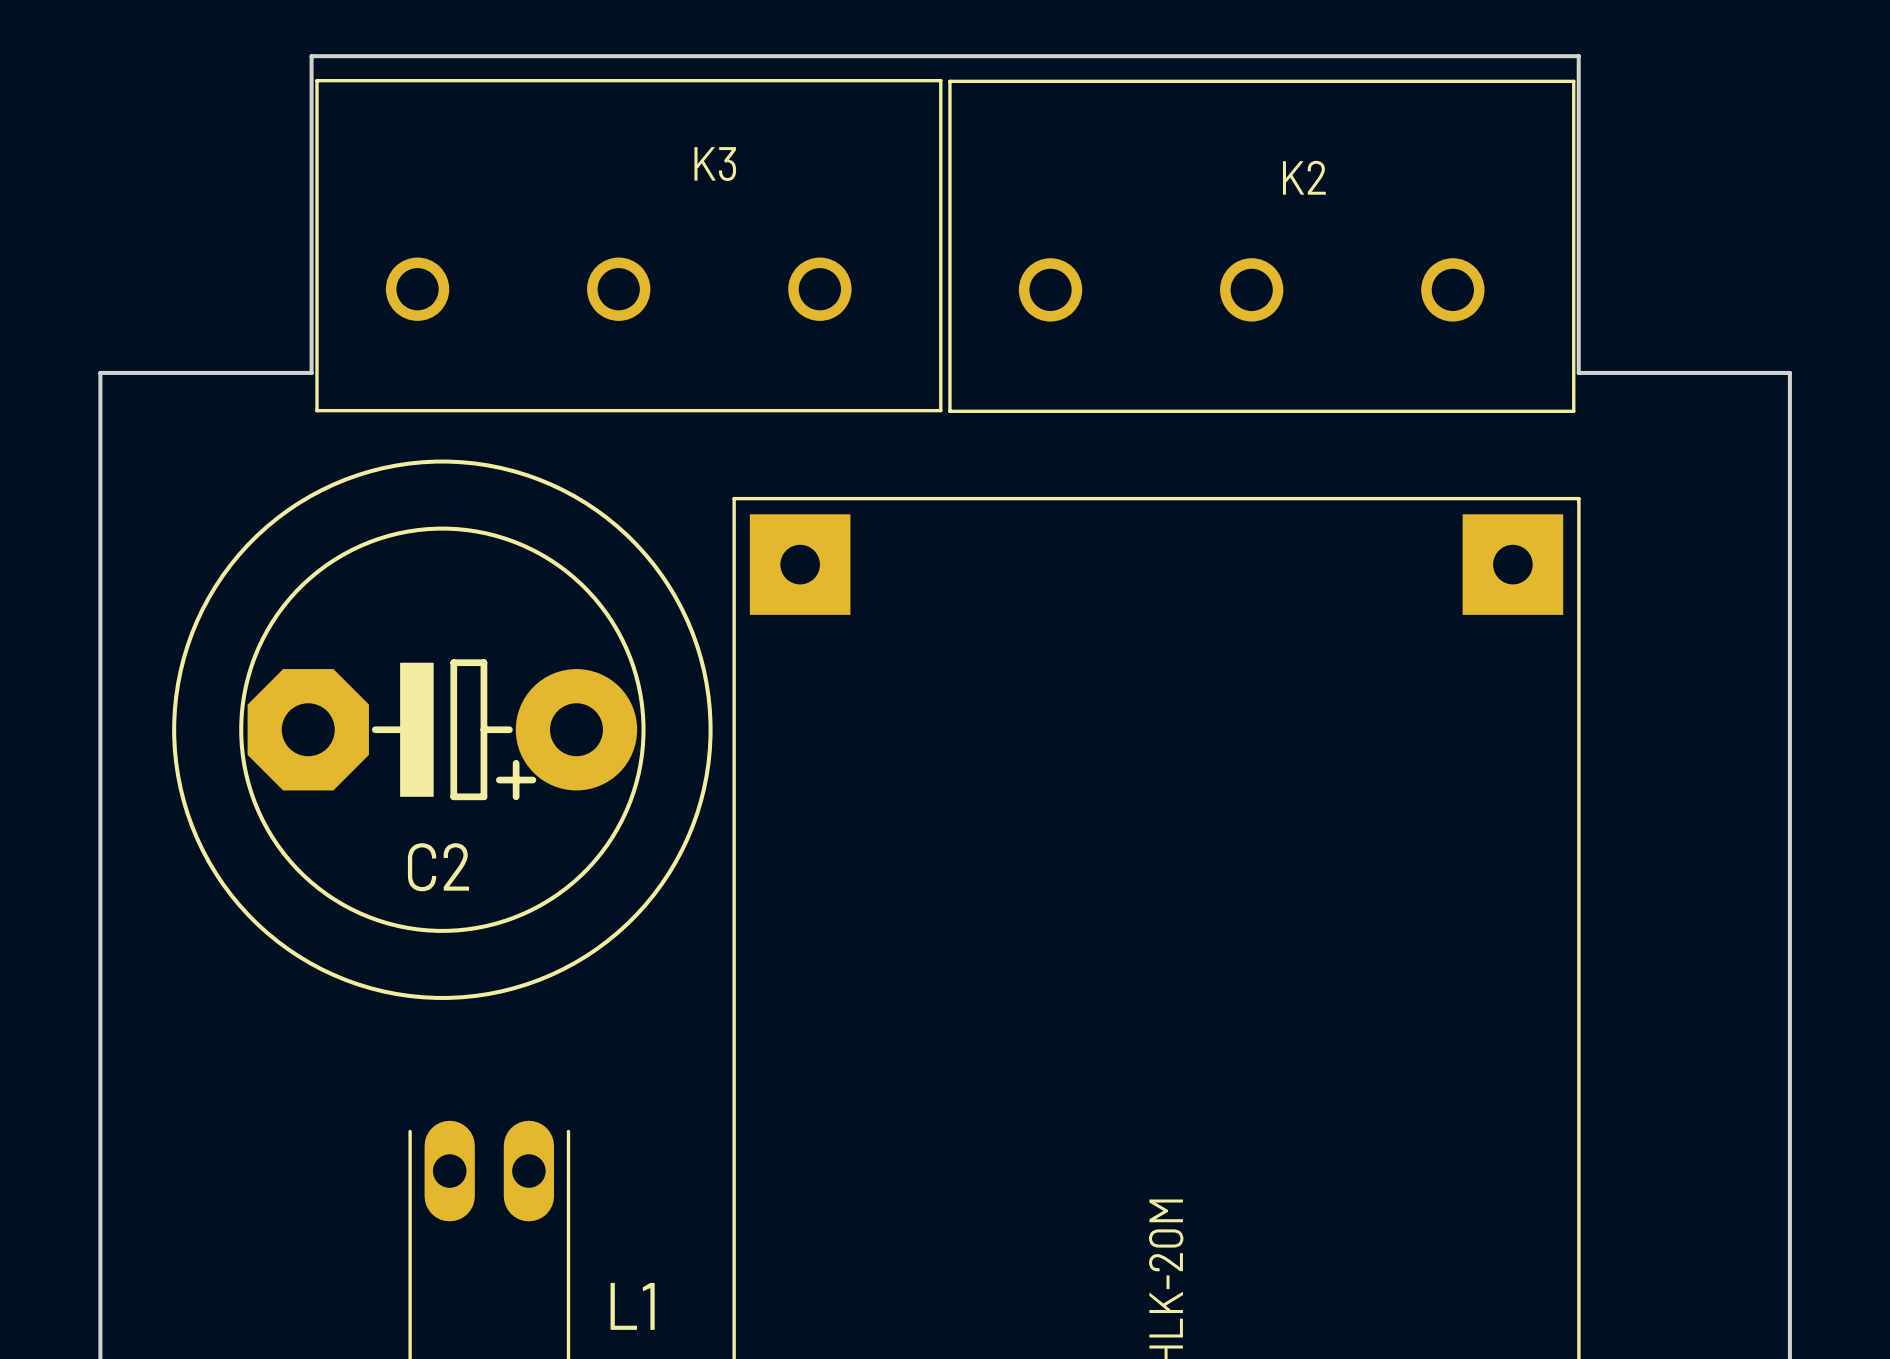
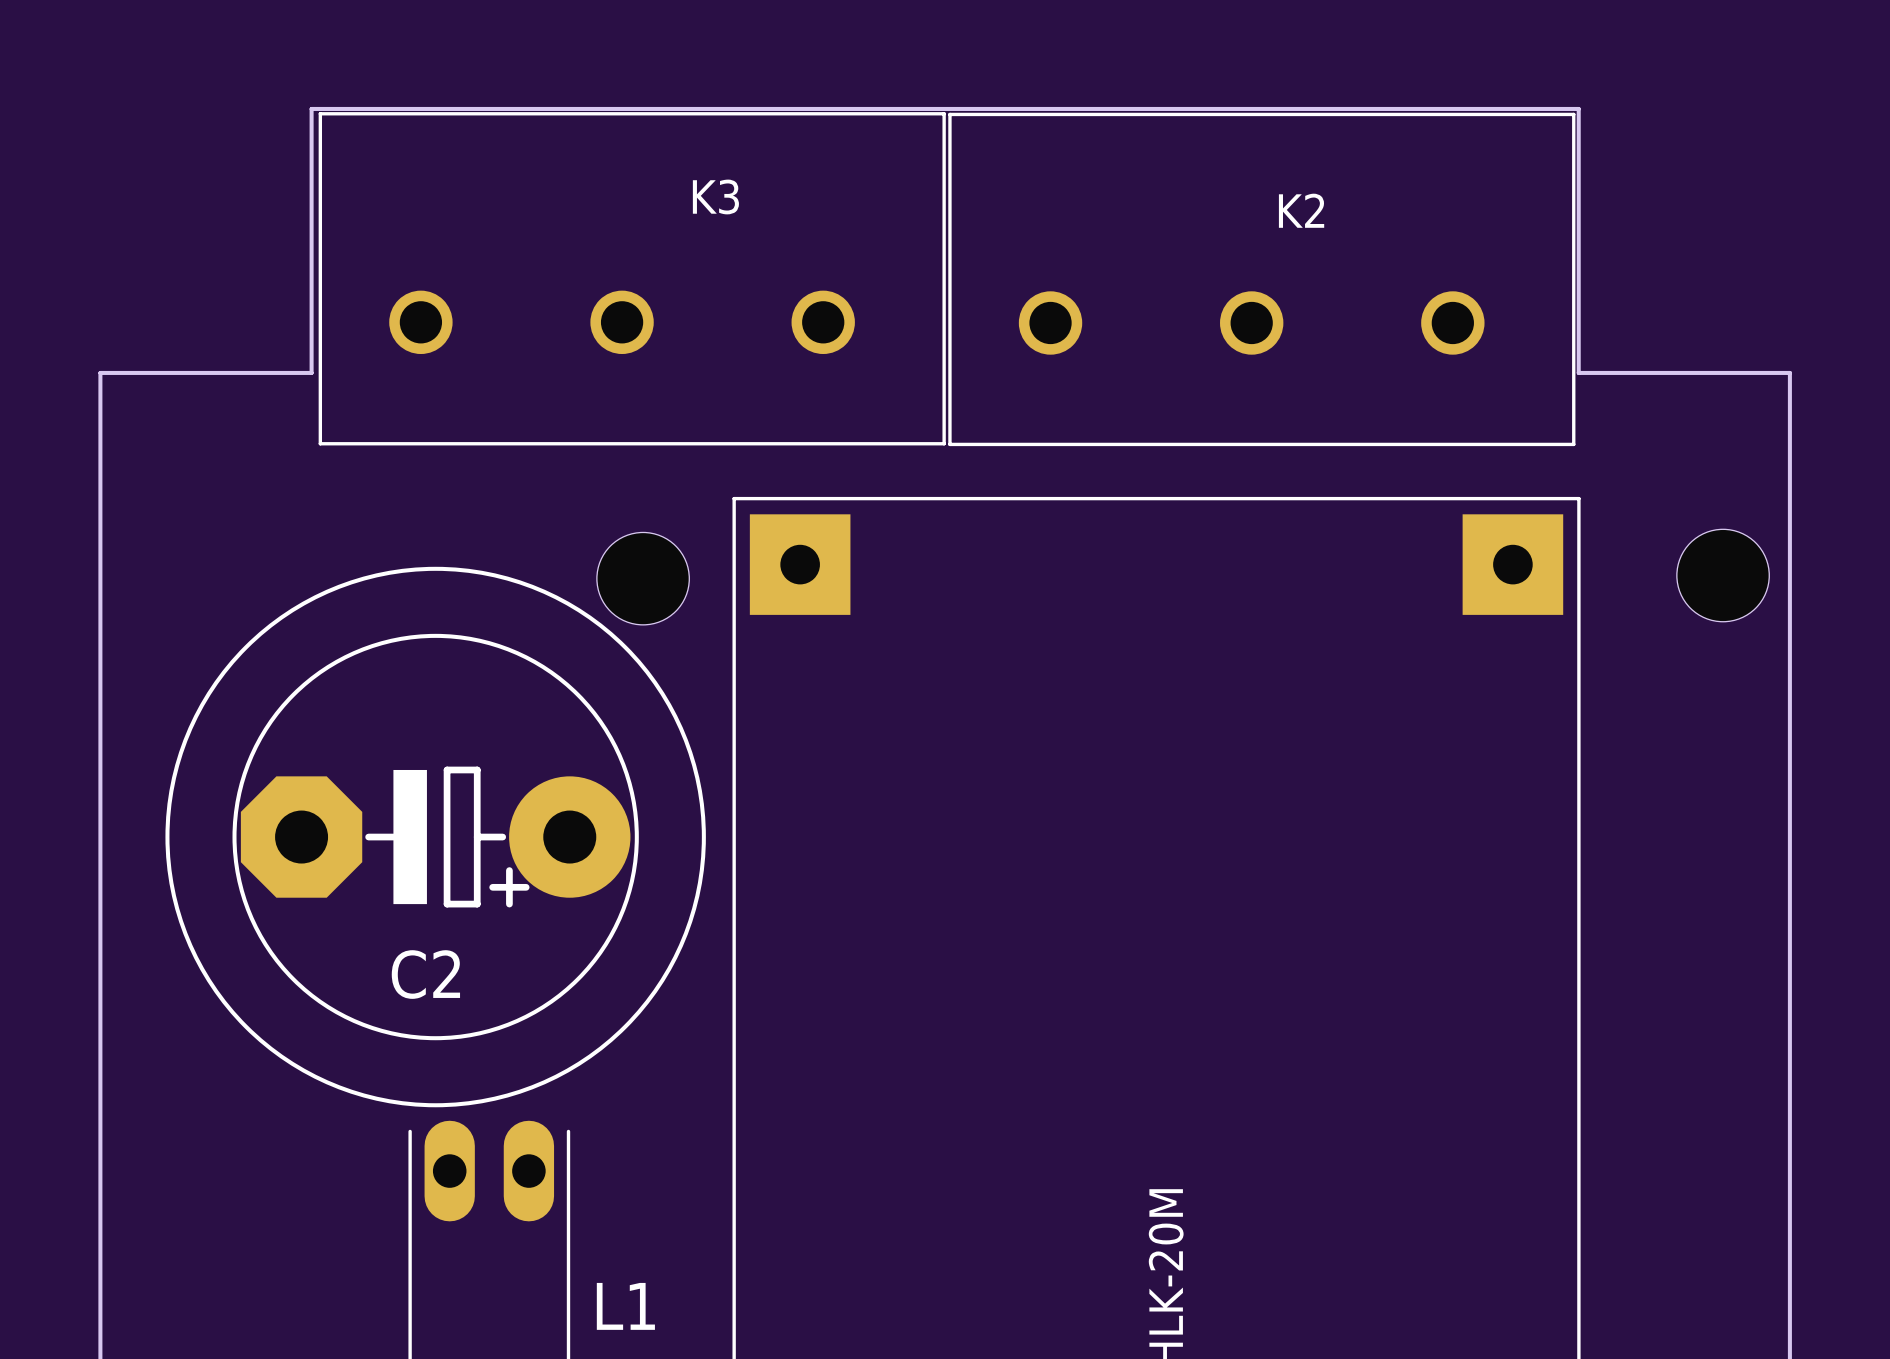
board edge: (311, 108) (311, 56) (1578, 56) (1578, 108) -> (311, 108) (1578, 108)
K3 position: (628, 245) -> (632, 278)
K2 position: (1261, 246) -> (1261, 279)
hole: none -> (1723, 575)
hole: none -> (643, 578)
C2 position: (442, 729) -> (435, 837)

